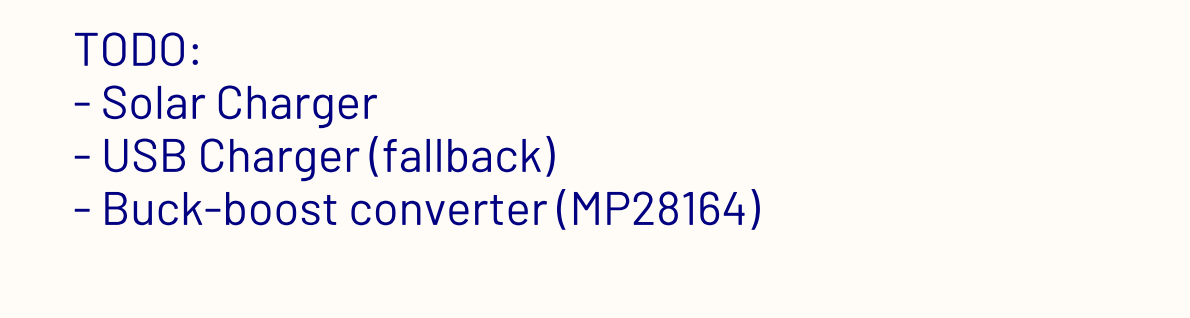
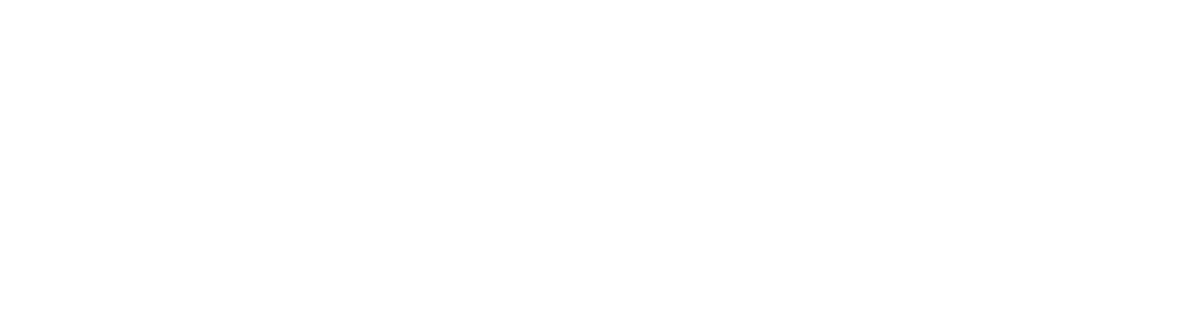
text: TODO: (136, 49) -> none
text: - Solar Charger (226, 106) -> none
text: - USB Charger (fallback) (314, 158) -> none
text: - Buck-boost converter (MP28164) (417, 209) -> none

